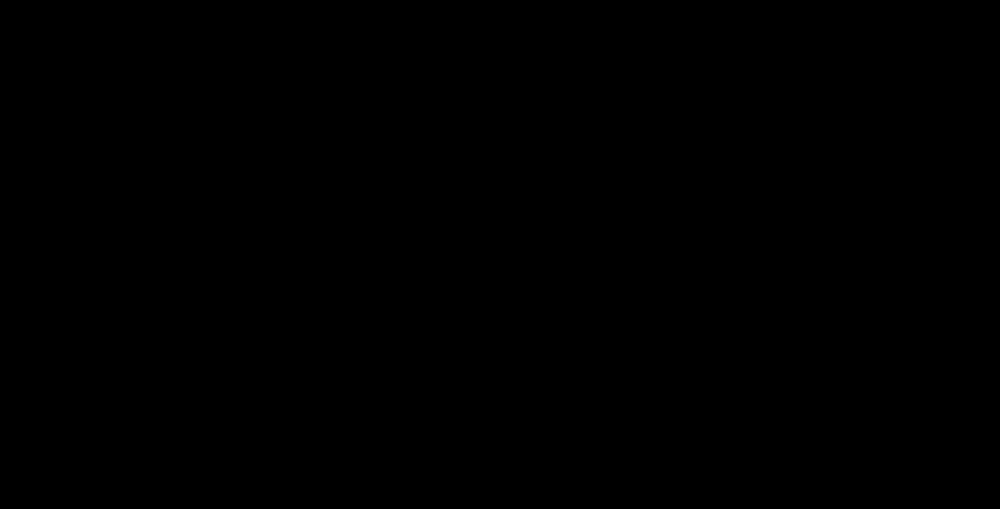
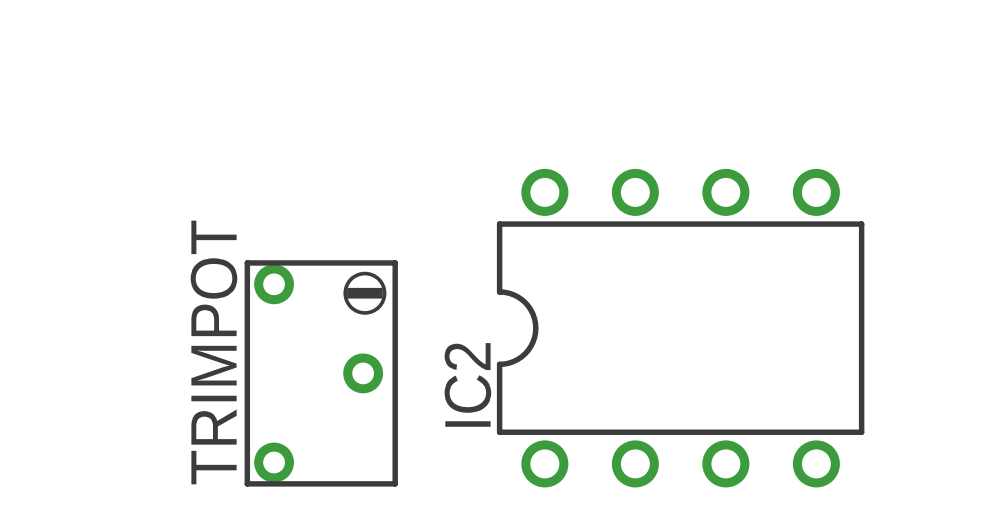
IC2: none -> (680, 328)
TRIMPOT: none -> (321, 373)

